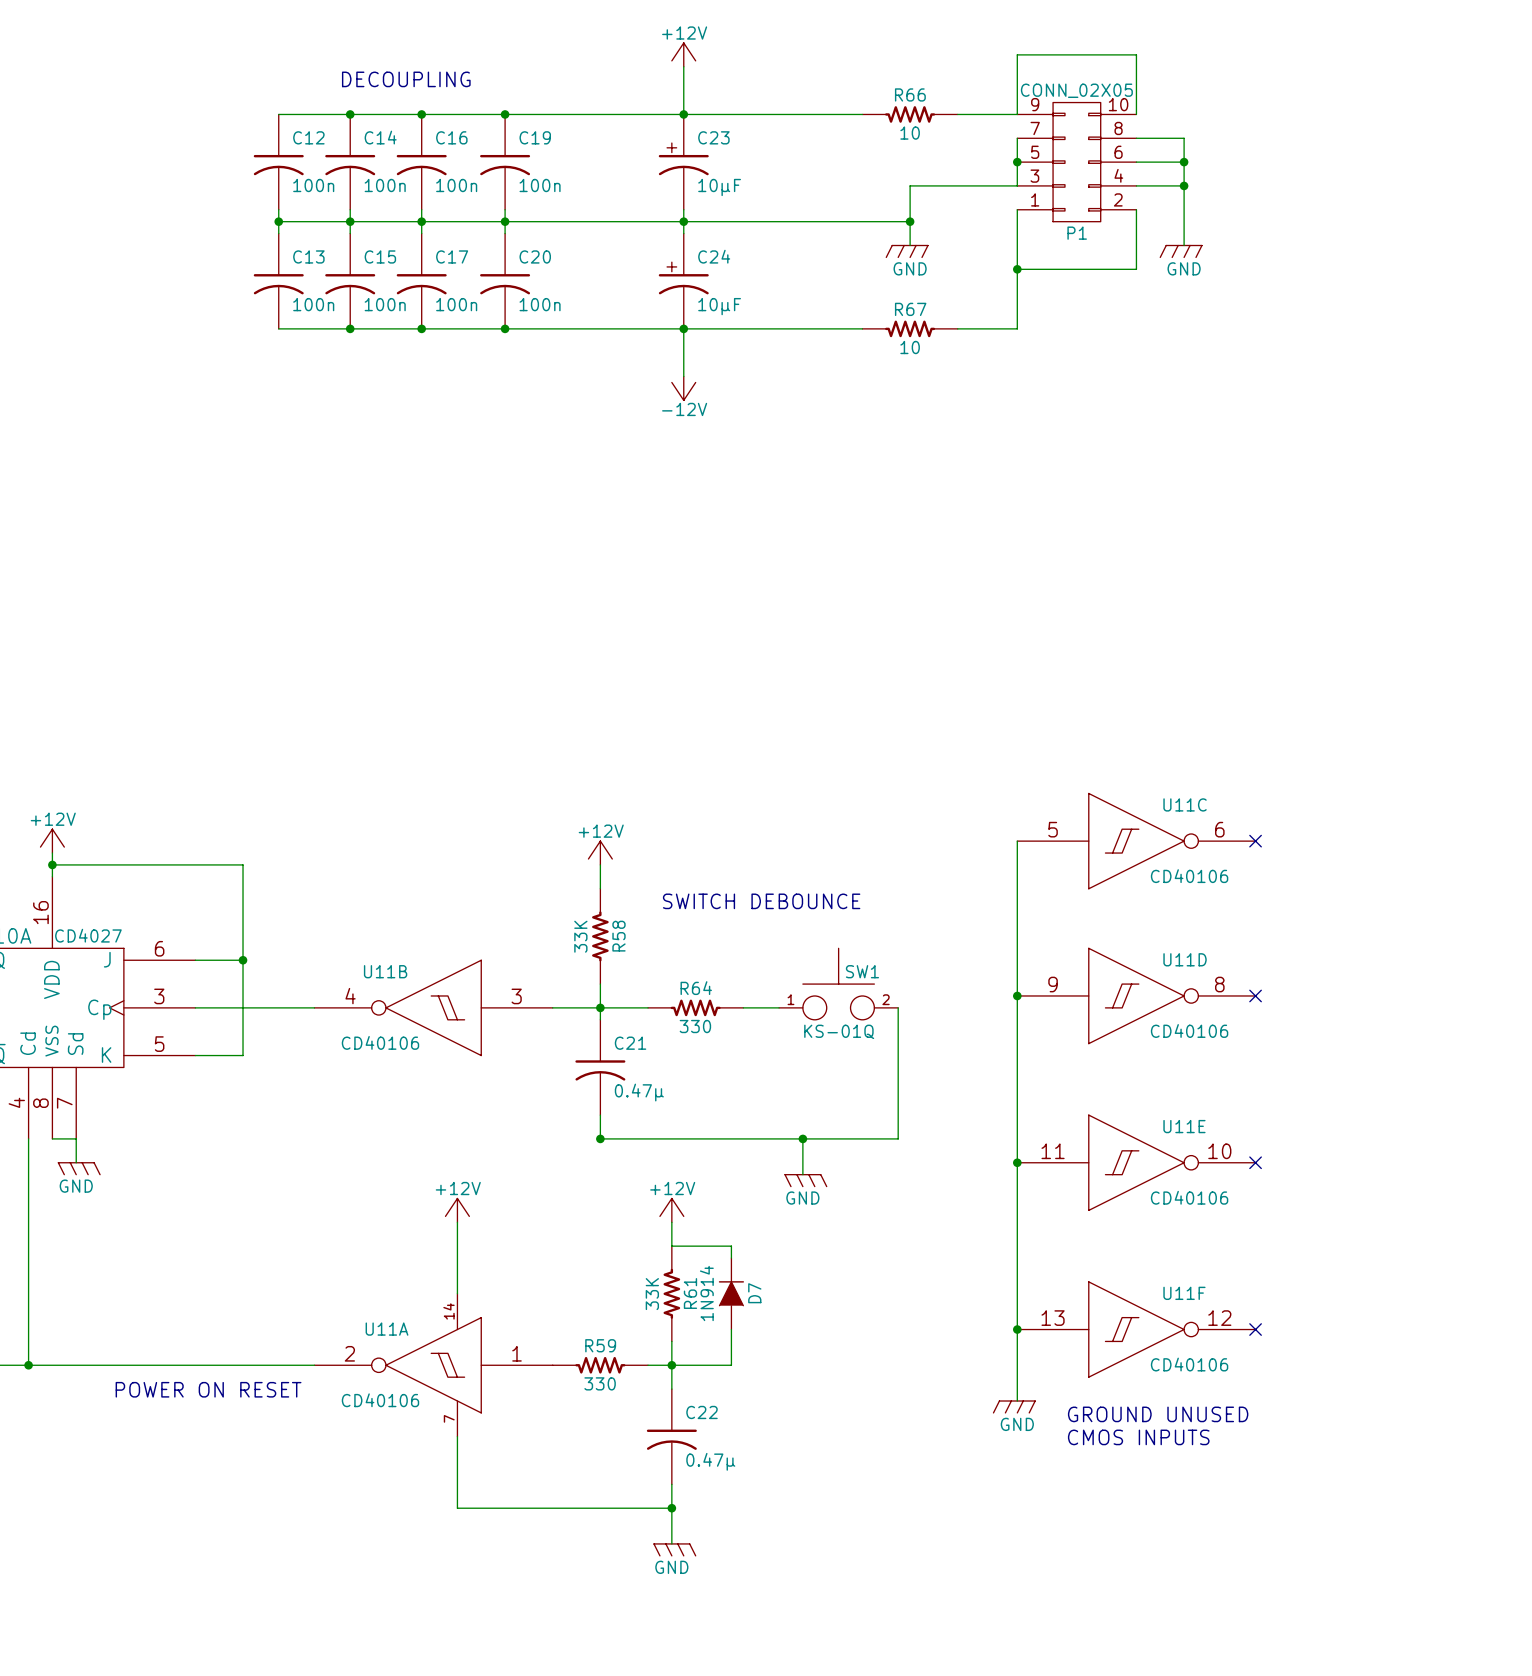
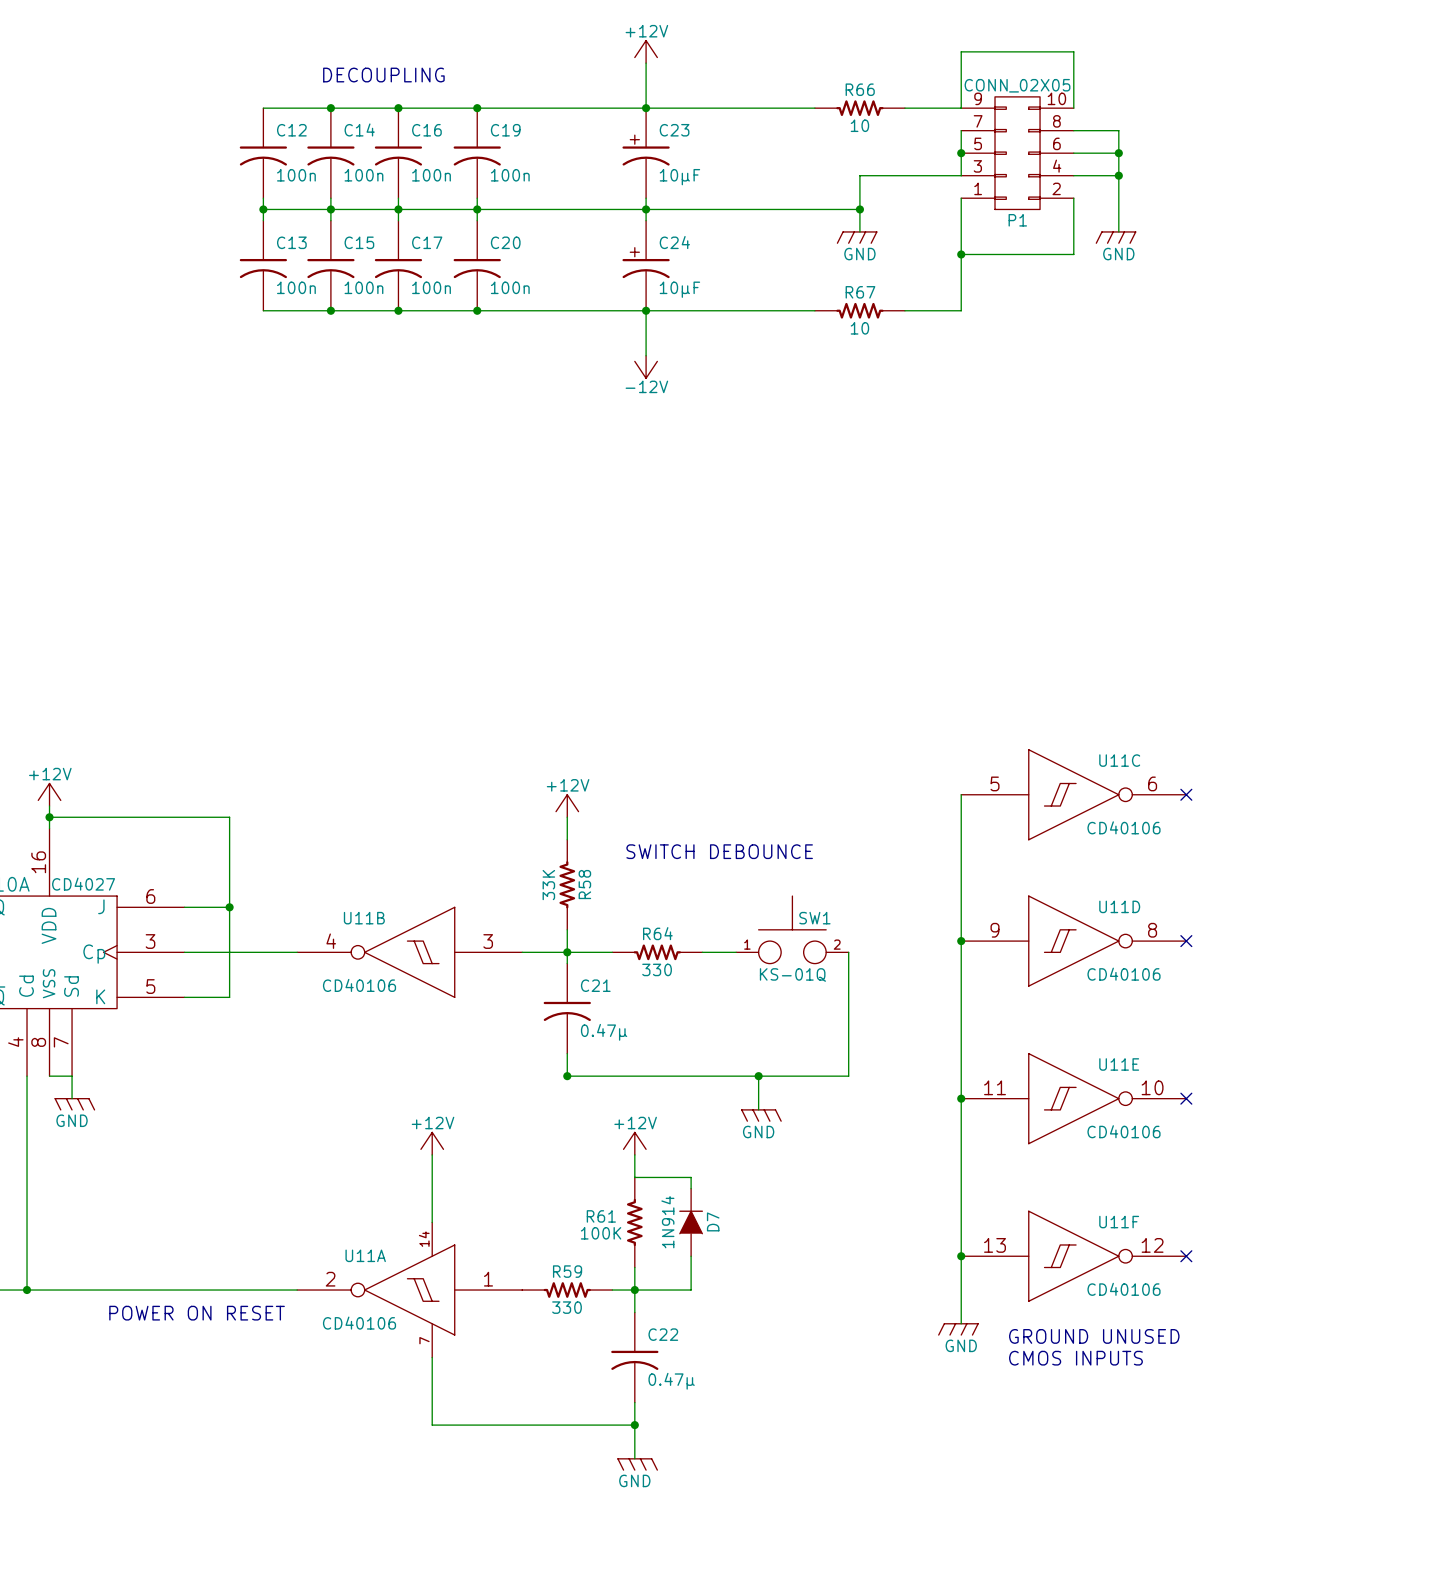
R61 name rotation: 0° (690, 1293) -> 90° clockwise (601, 1216)
R61 name position: R61 (690, 1293) -> R61 (601, 1216)
R61 value: 33K (652, 1294) -> 100K (601, 1233)

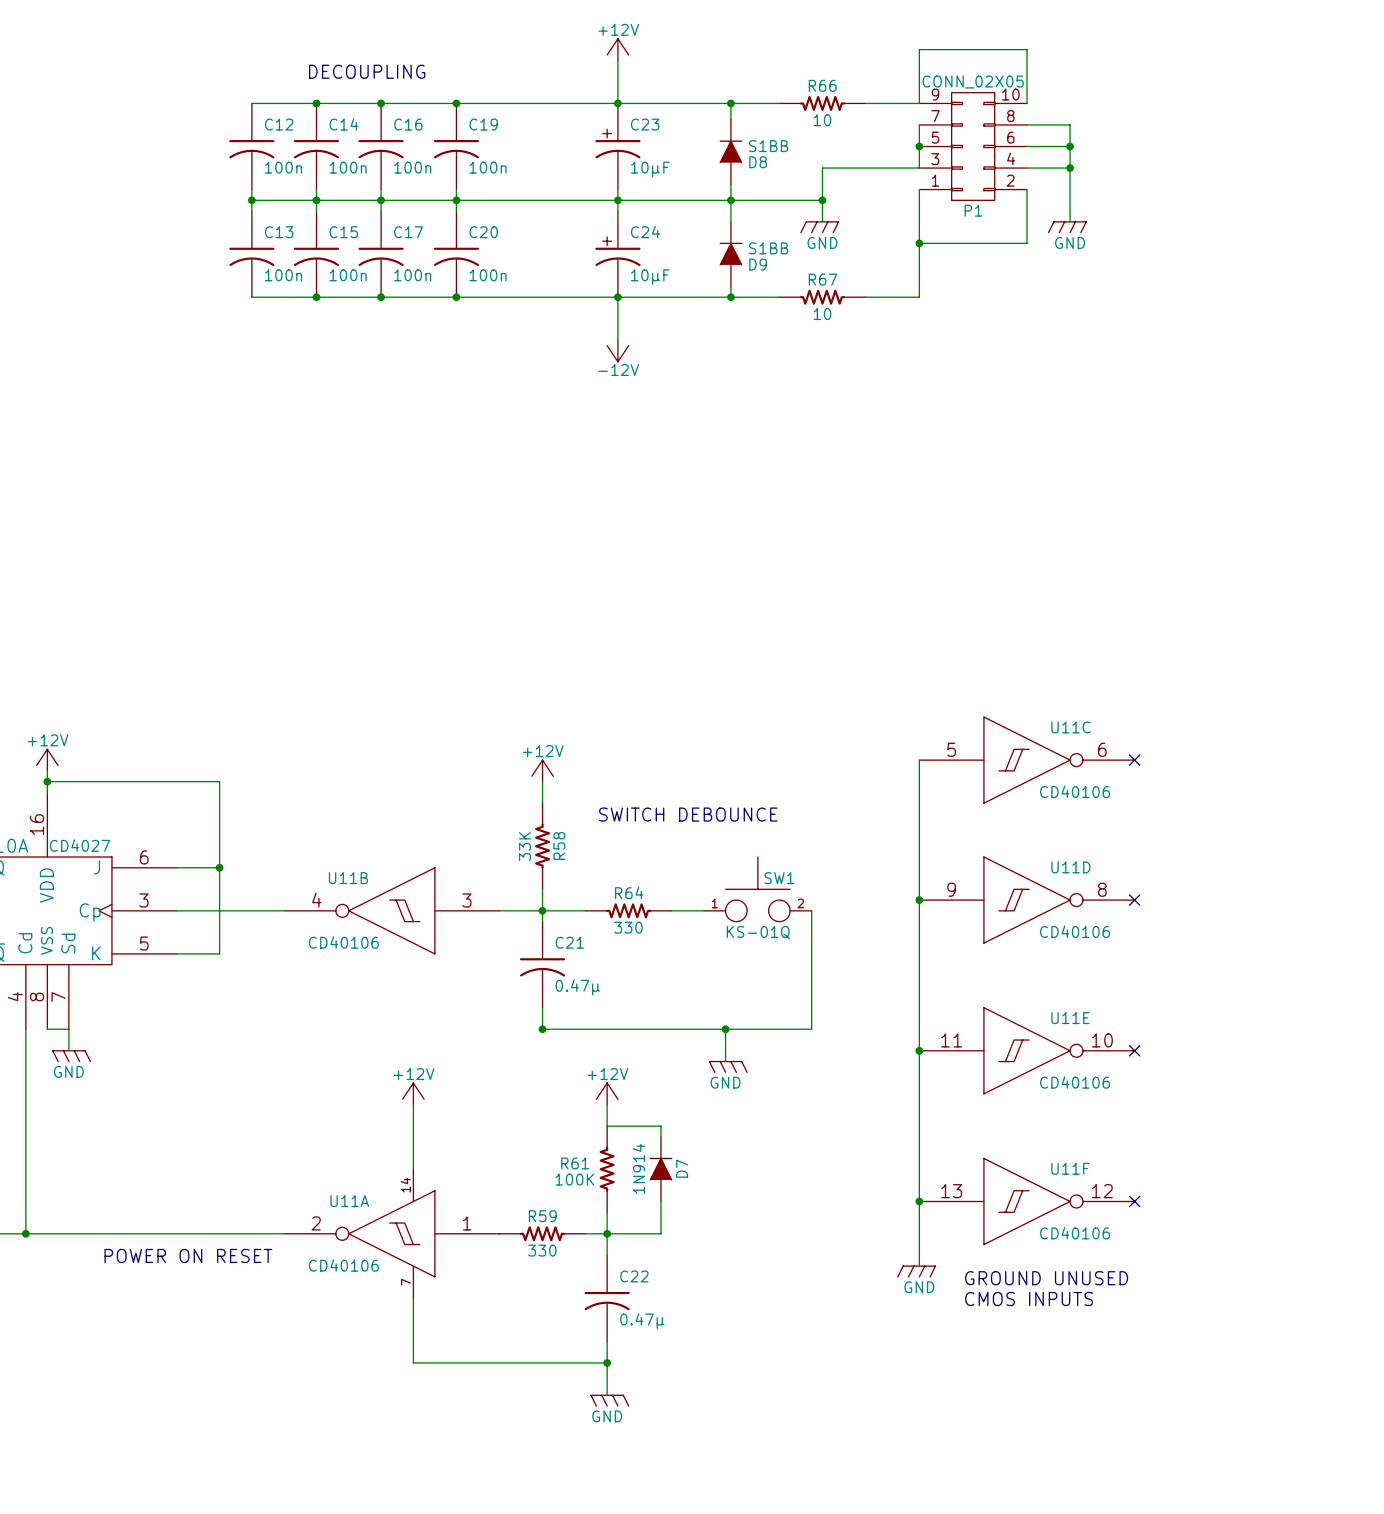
wire: none -> (730, 103) (730, 119)
junction: none -> (730, 103)
D8: none -> S1BB (730, 151)
wire: none -> (730, 184) (730, 221)
junction: none -> (730, 200)
D9: none -> S1BB (730, 254)
wire: none -> (730, 286) (730, 297)
junction: none -> (730, 297)

